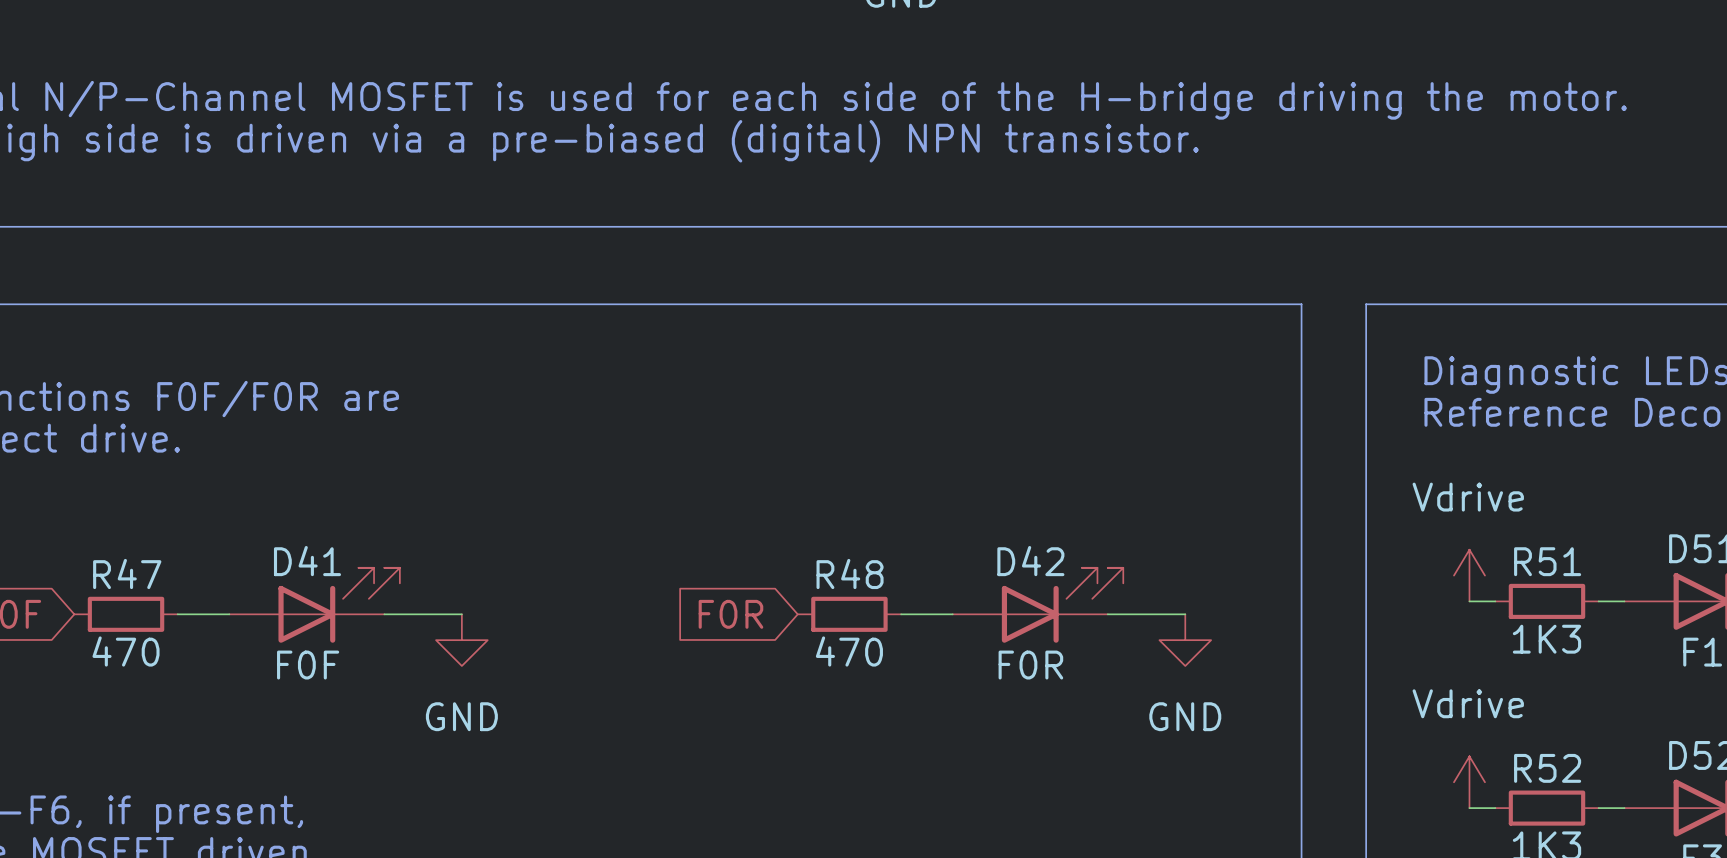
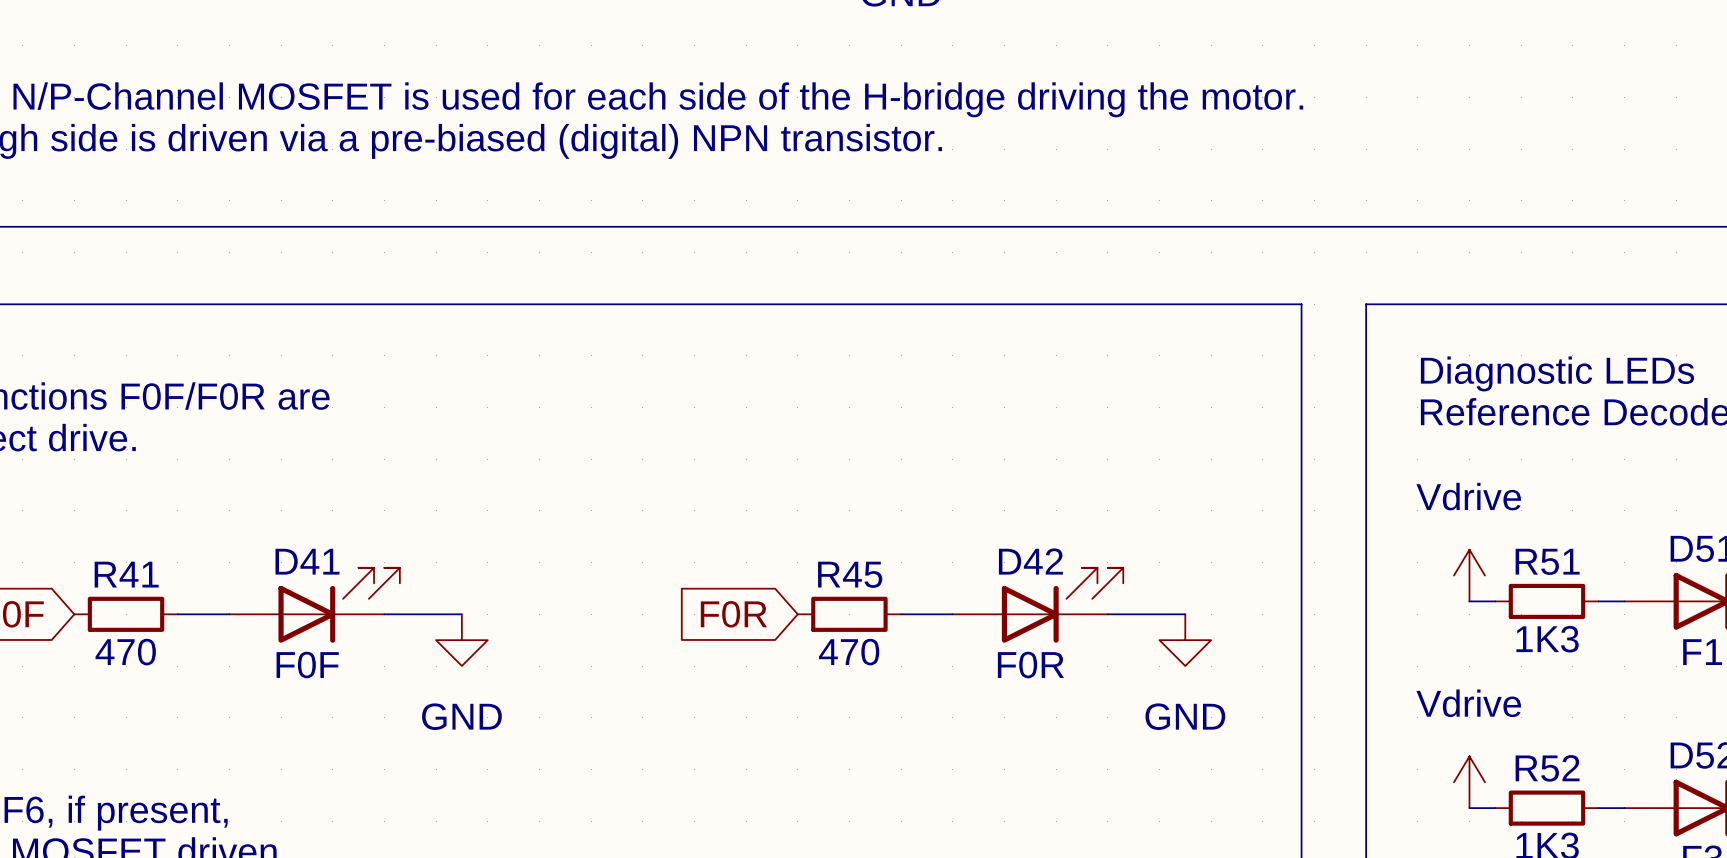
R47 name: R47 (127, 573) -> R41 (126, 574)
R48 name: R48 (850, 573) -> R45 (850, 574)

